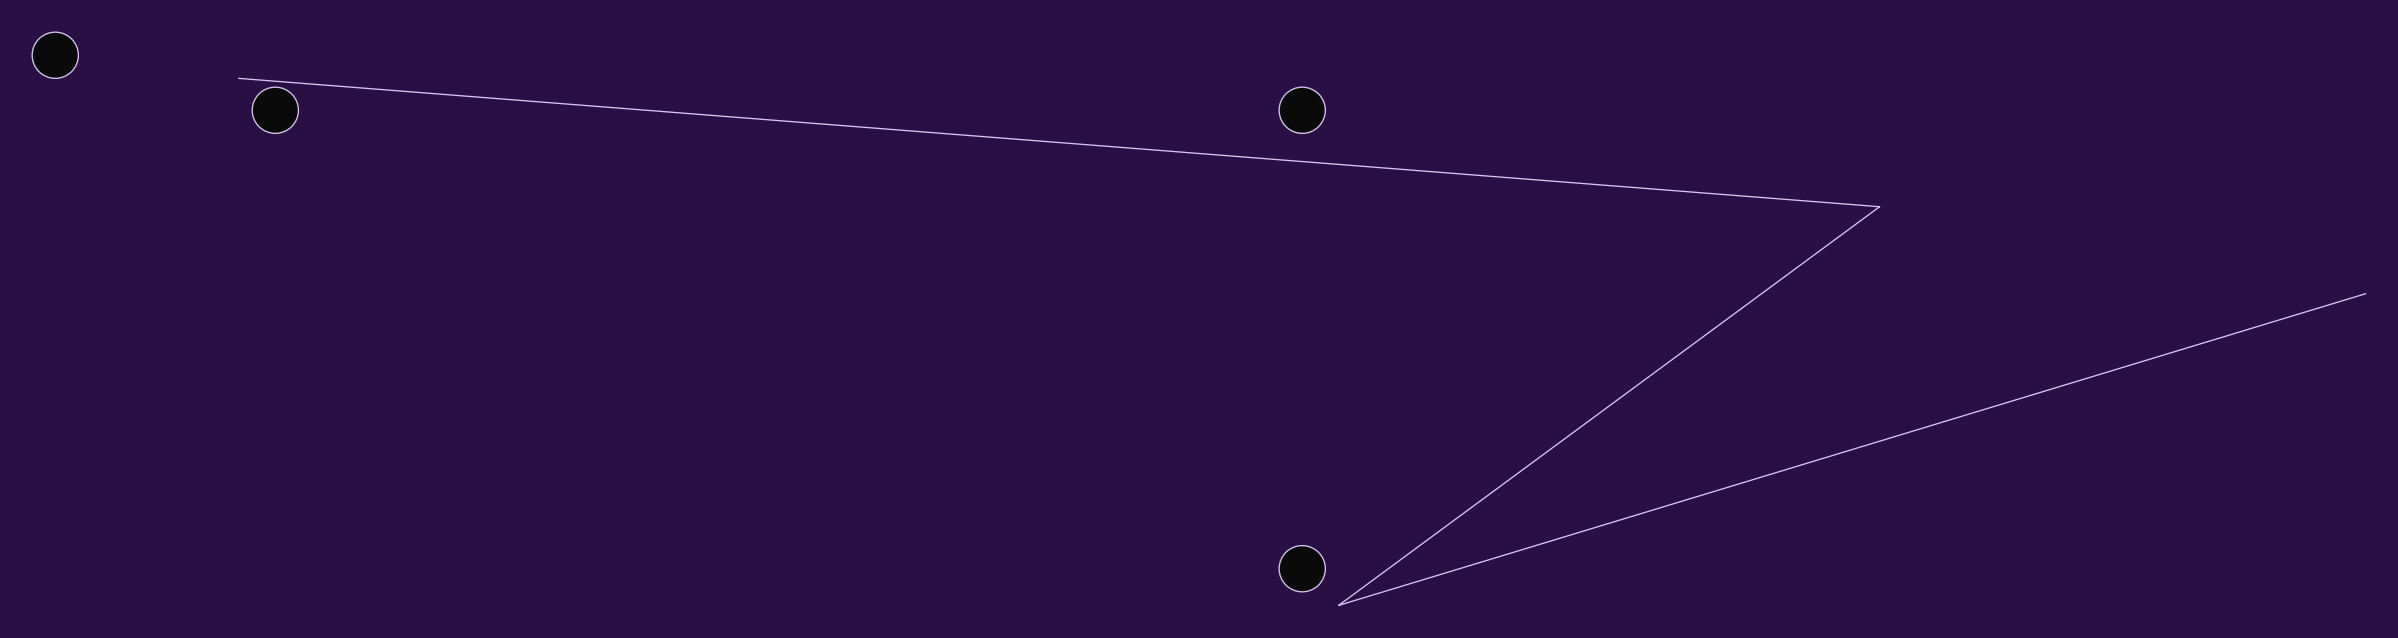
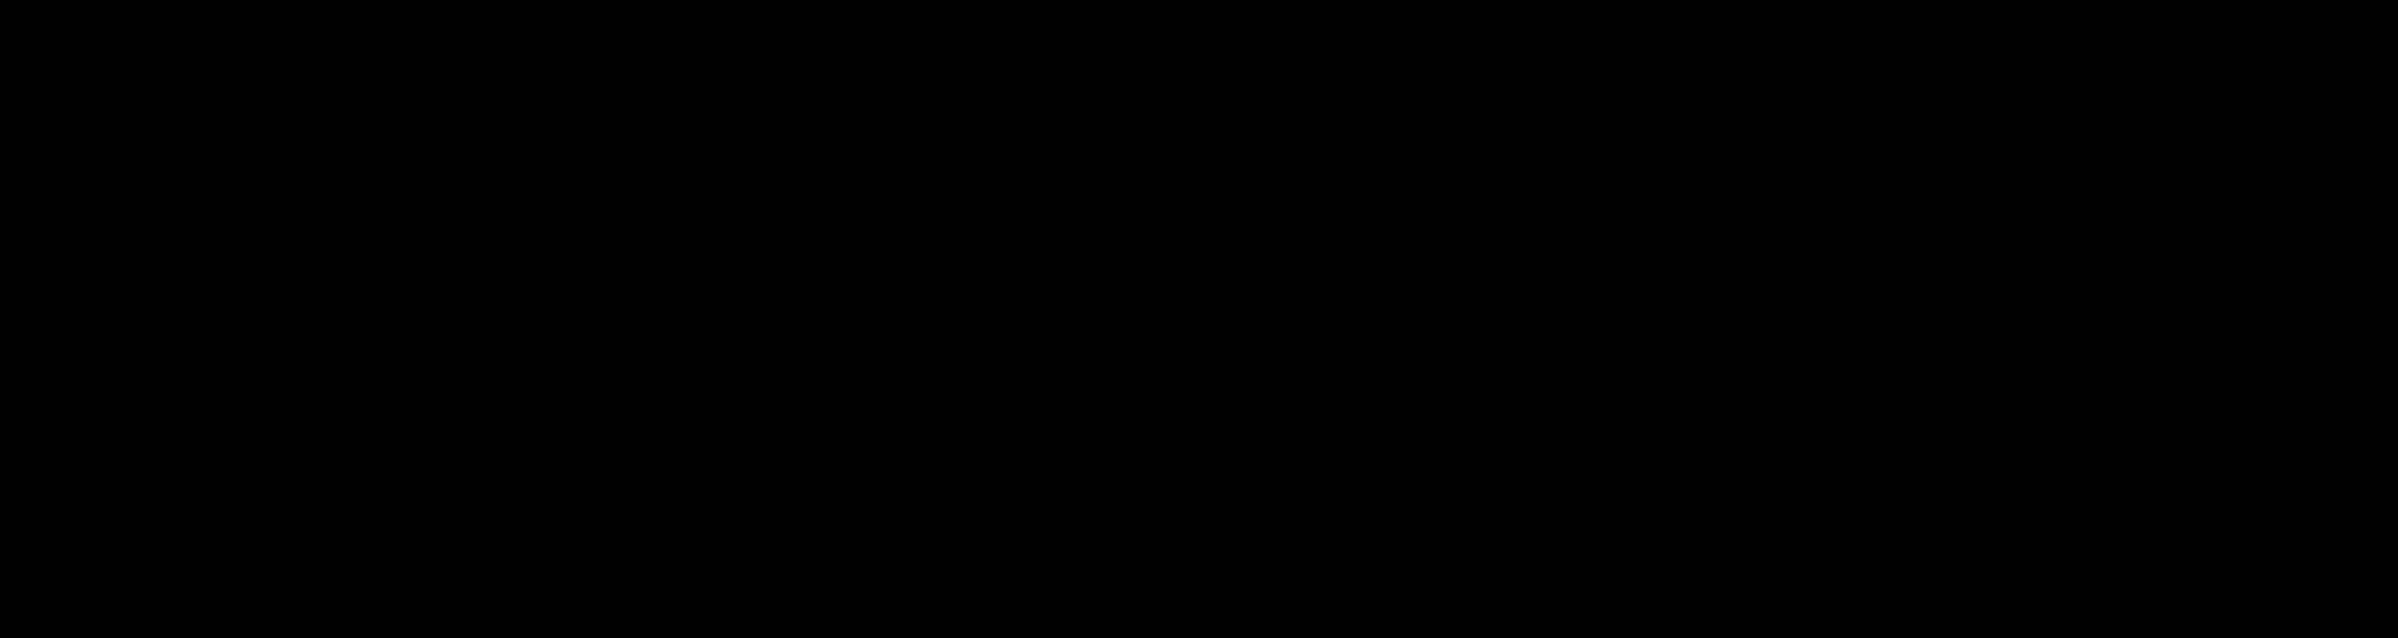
hole: (55, 55) -> none
board edge: (238, 78) (1879, 206) (1338, 605) (2365, 293) -> none
hole: (275, 110) -> none
hole: (1302, 110) -> none
hole: (1302, 568) -> none

